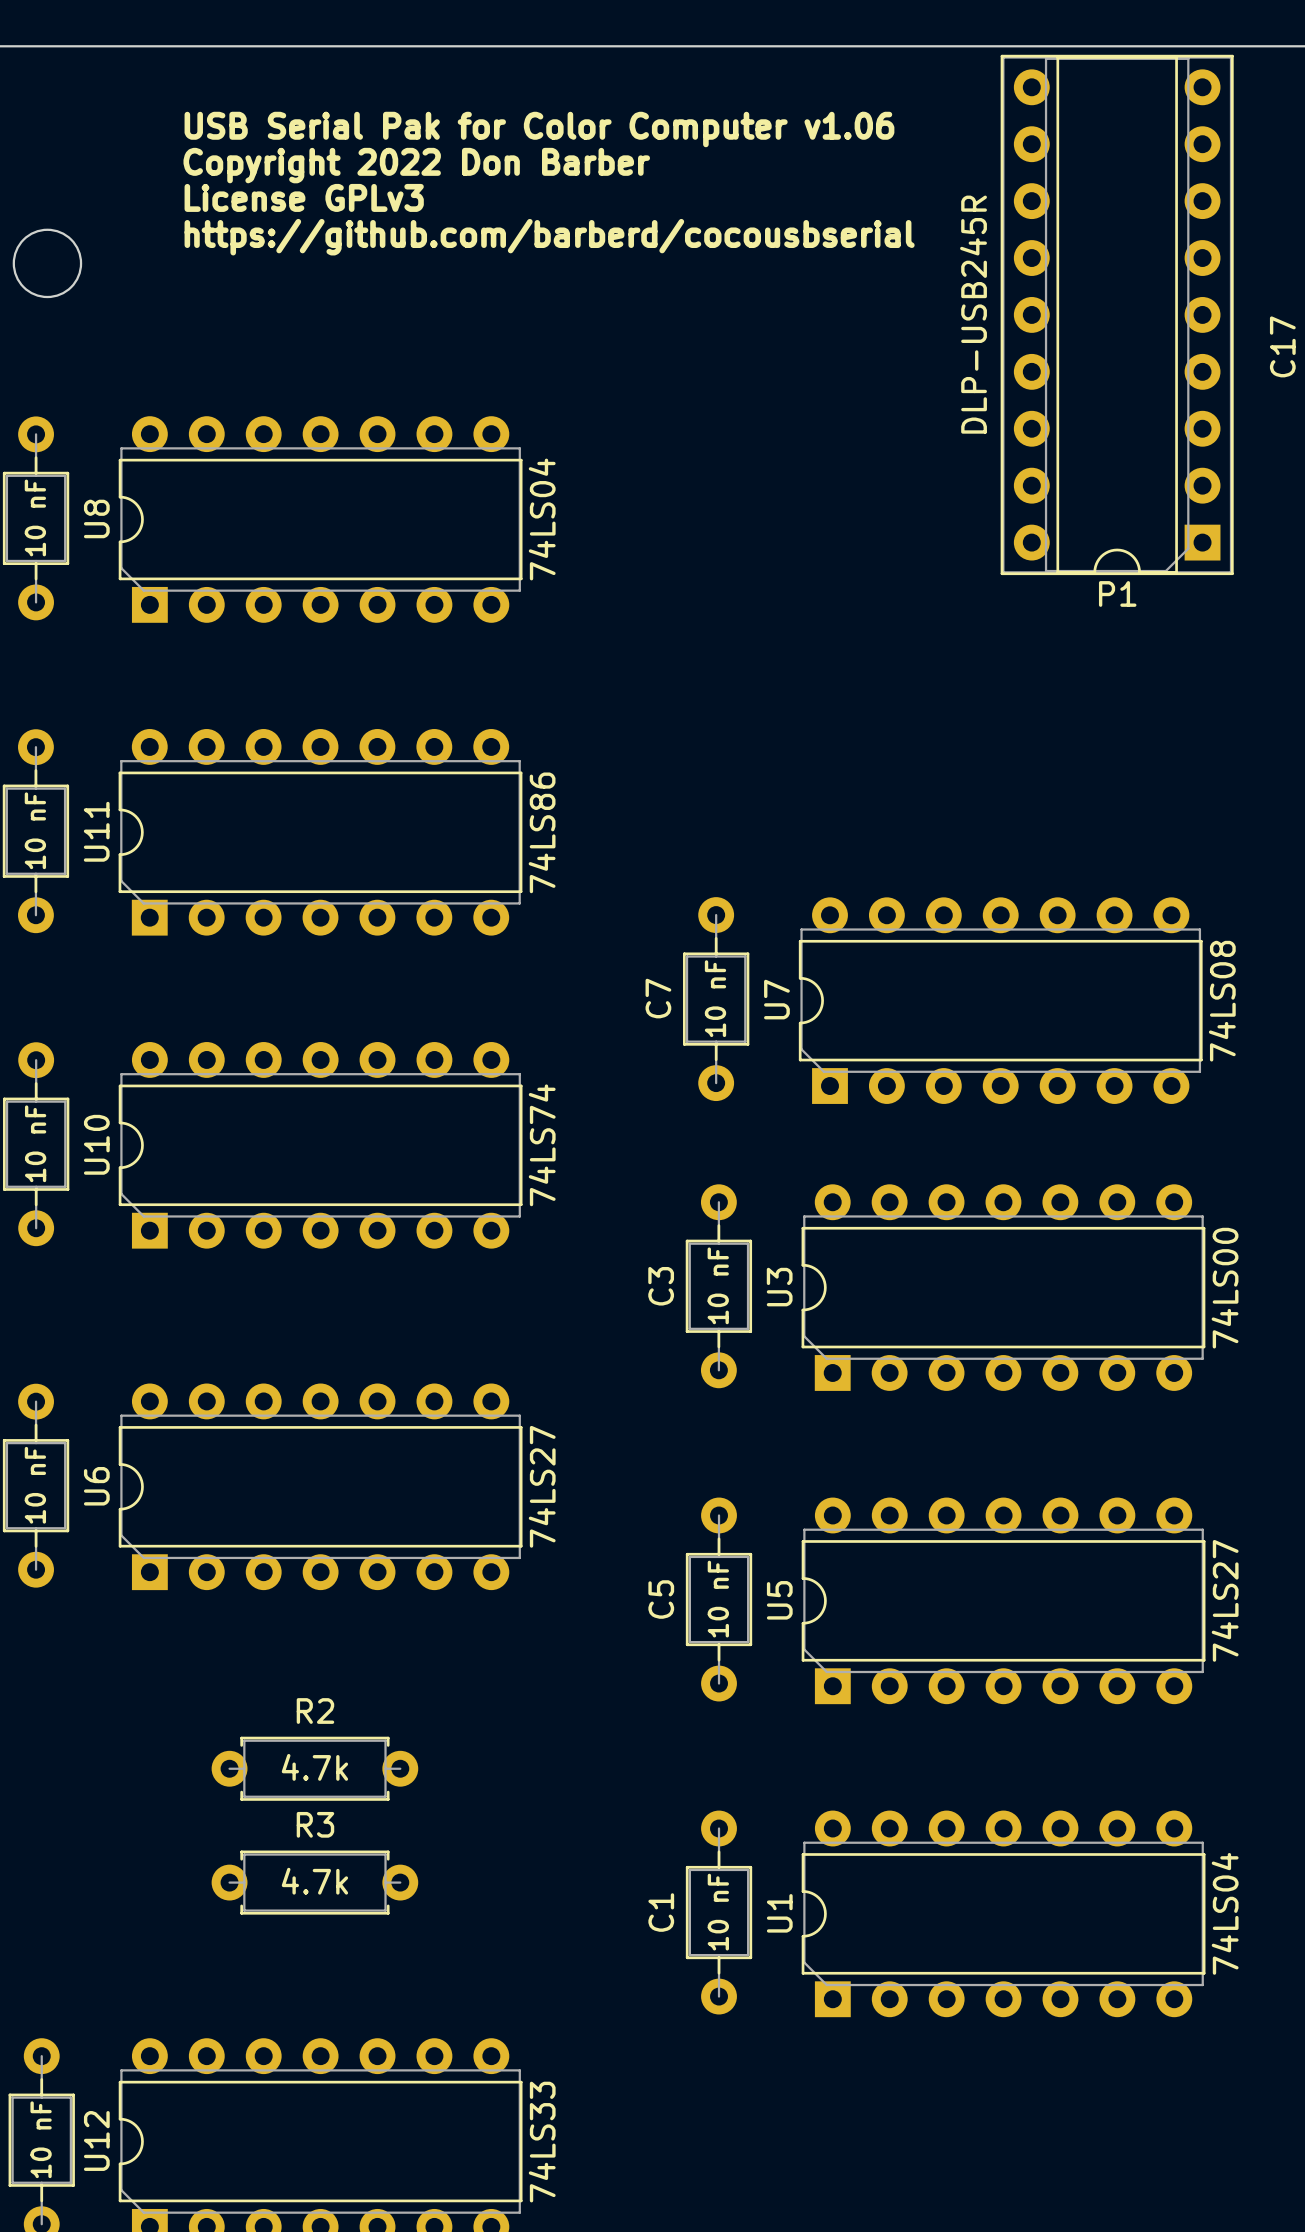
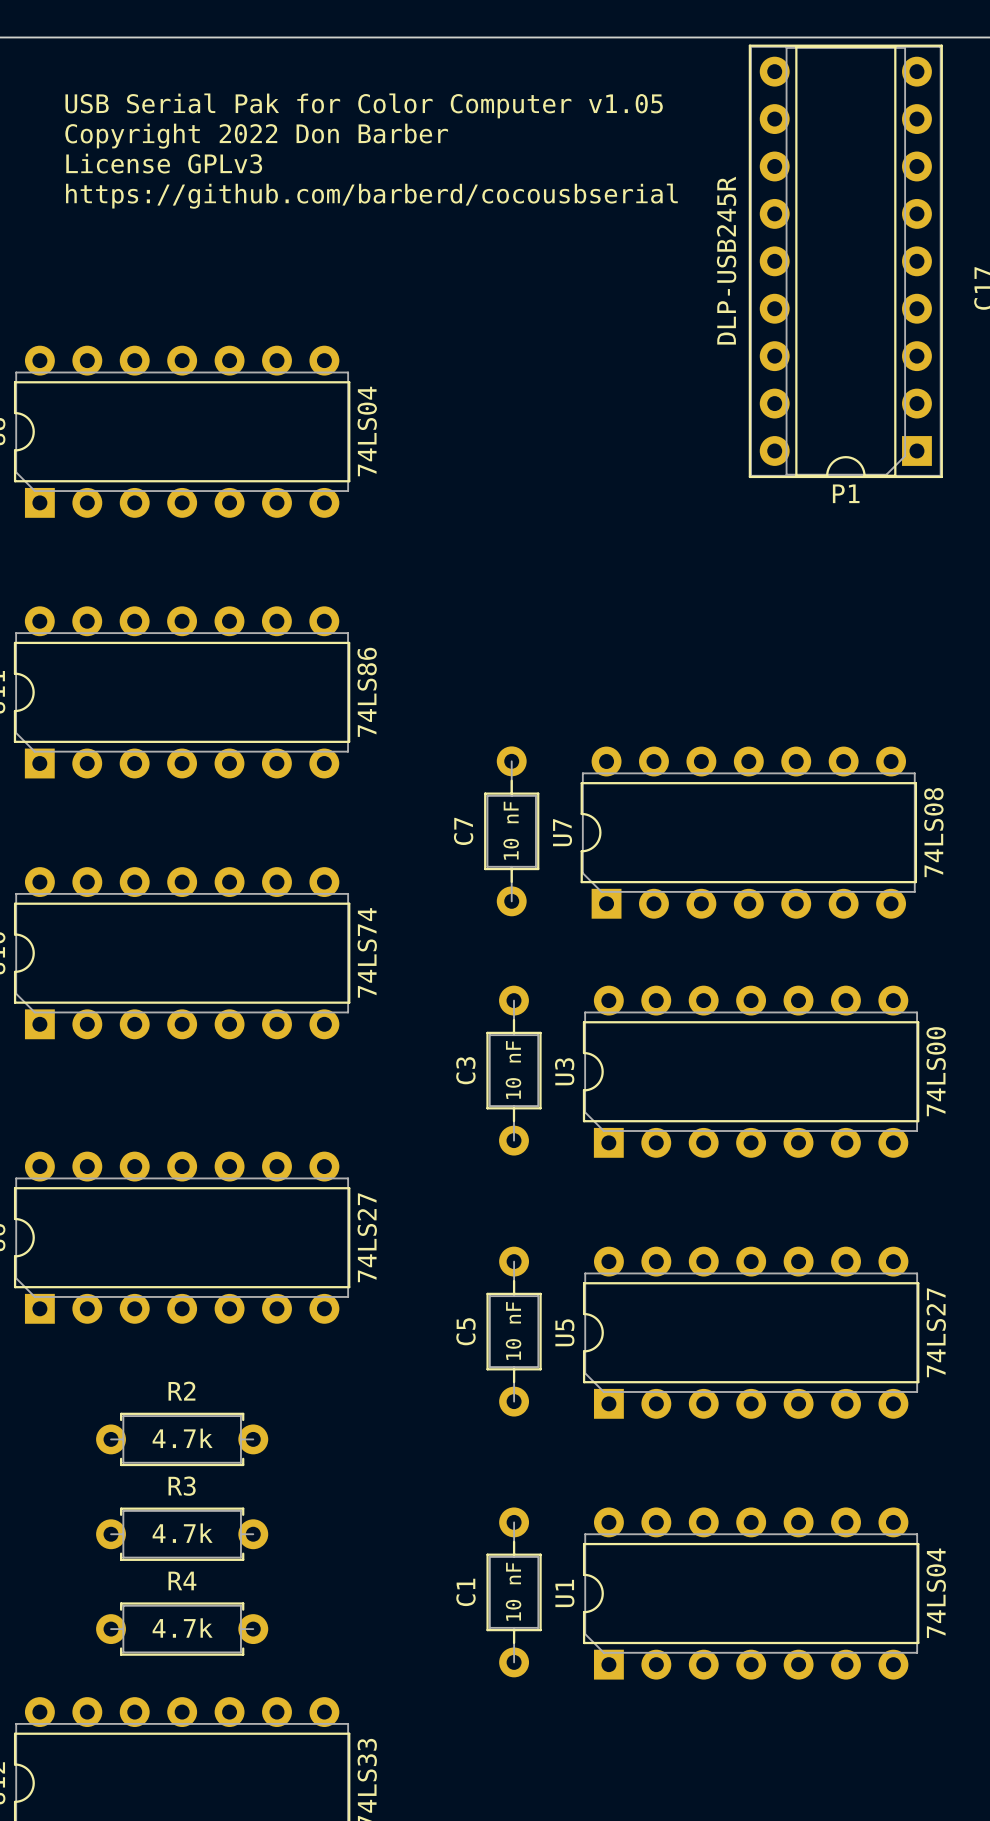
text: USB Serial Pak for Color Computer v1.06 (539, 129) -> USB Serial Pak for Color Computer v1.05 (364, 105)
R2 position: (314, 1768) -> (182, 1439)
R3 position: (314, 1882) -> (182, 1534)
R4: none -> 4.7k (182, 1629)

